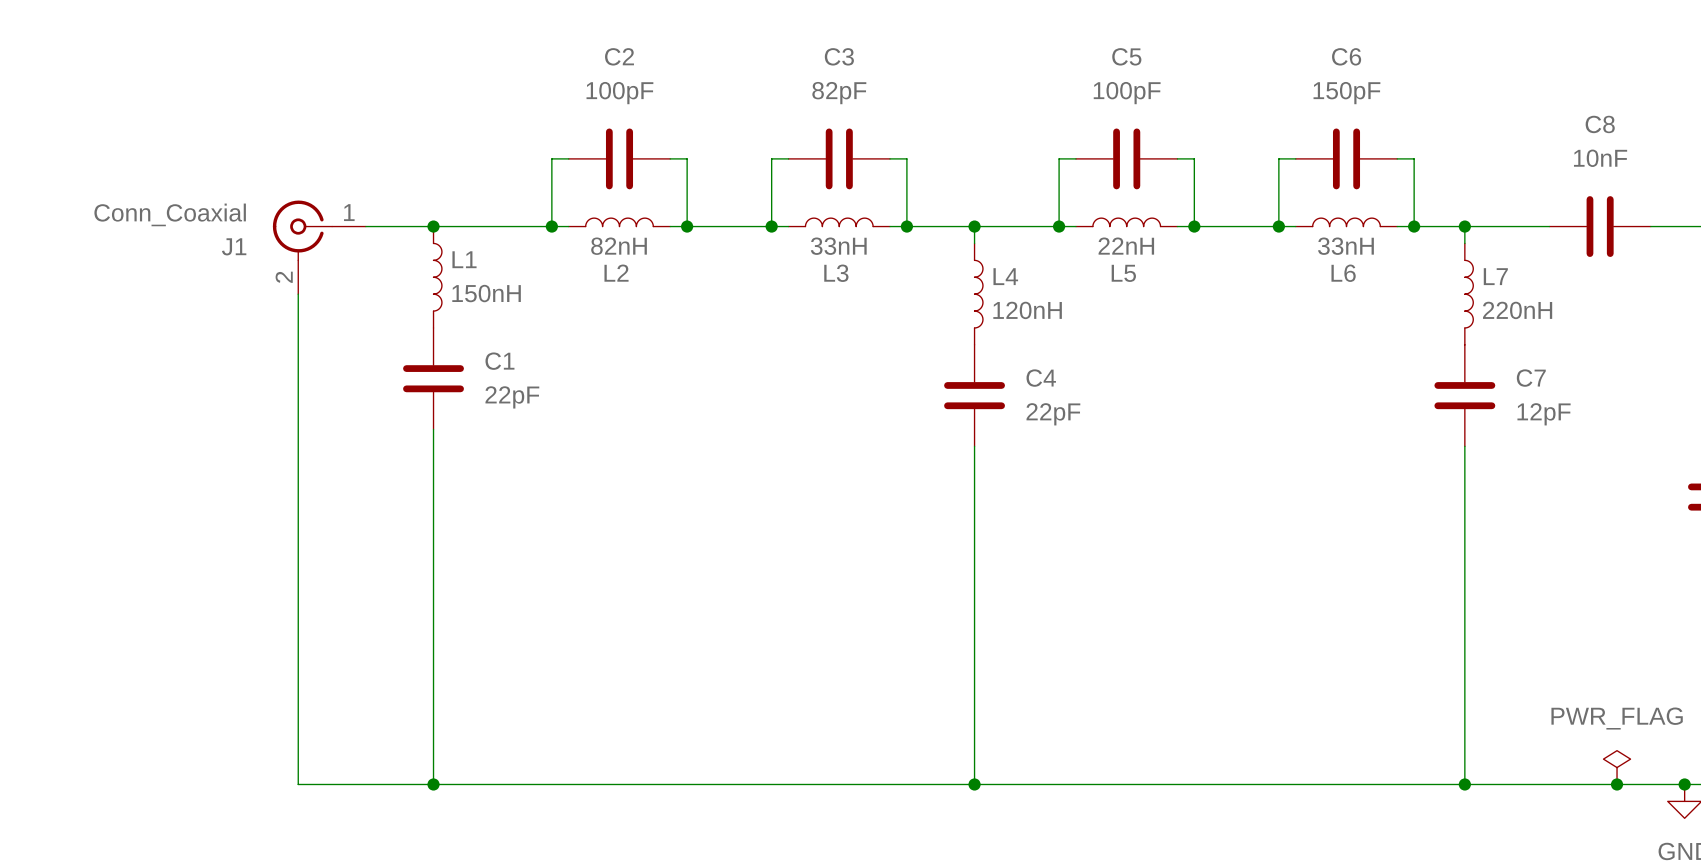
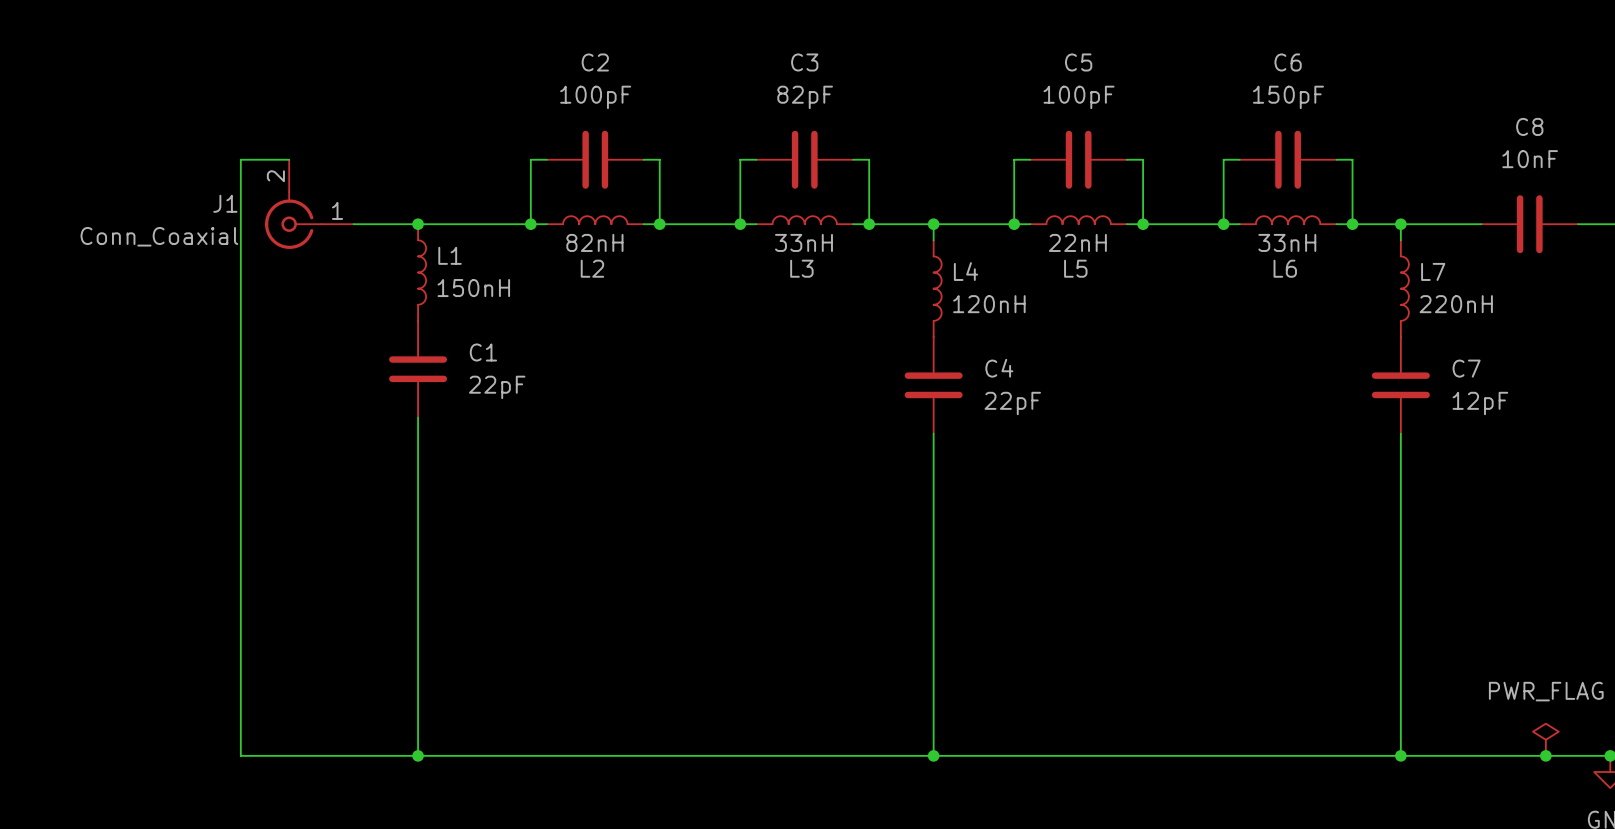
J1 flip: as is (302, 230) -> up-down (293, 220)
wire: (298, 294) (298, 784) -> (289, 159) (240, 159) (240, 755) (289, 755)

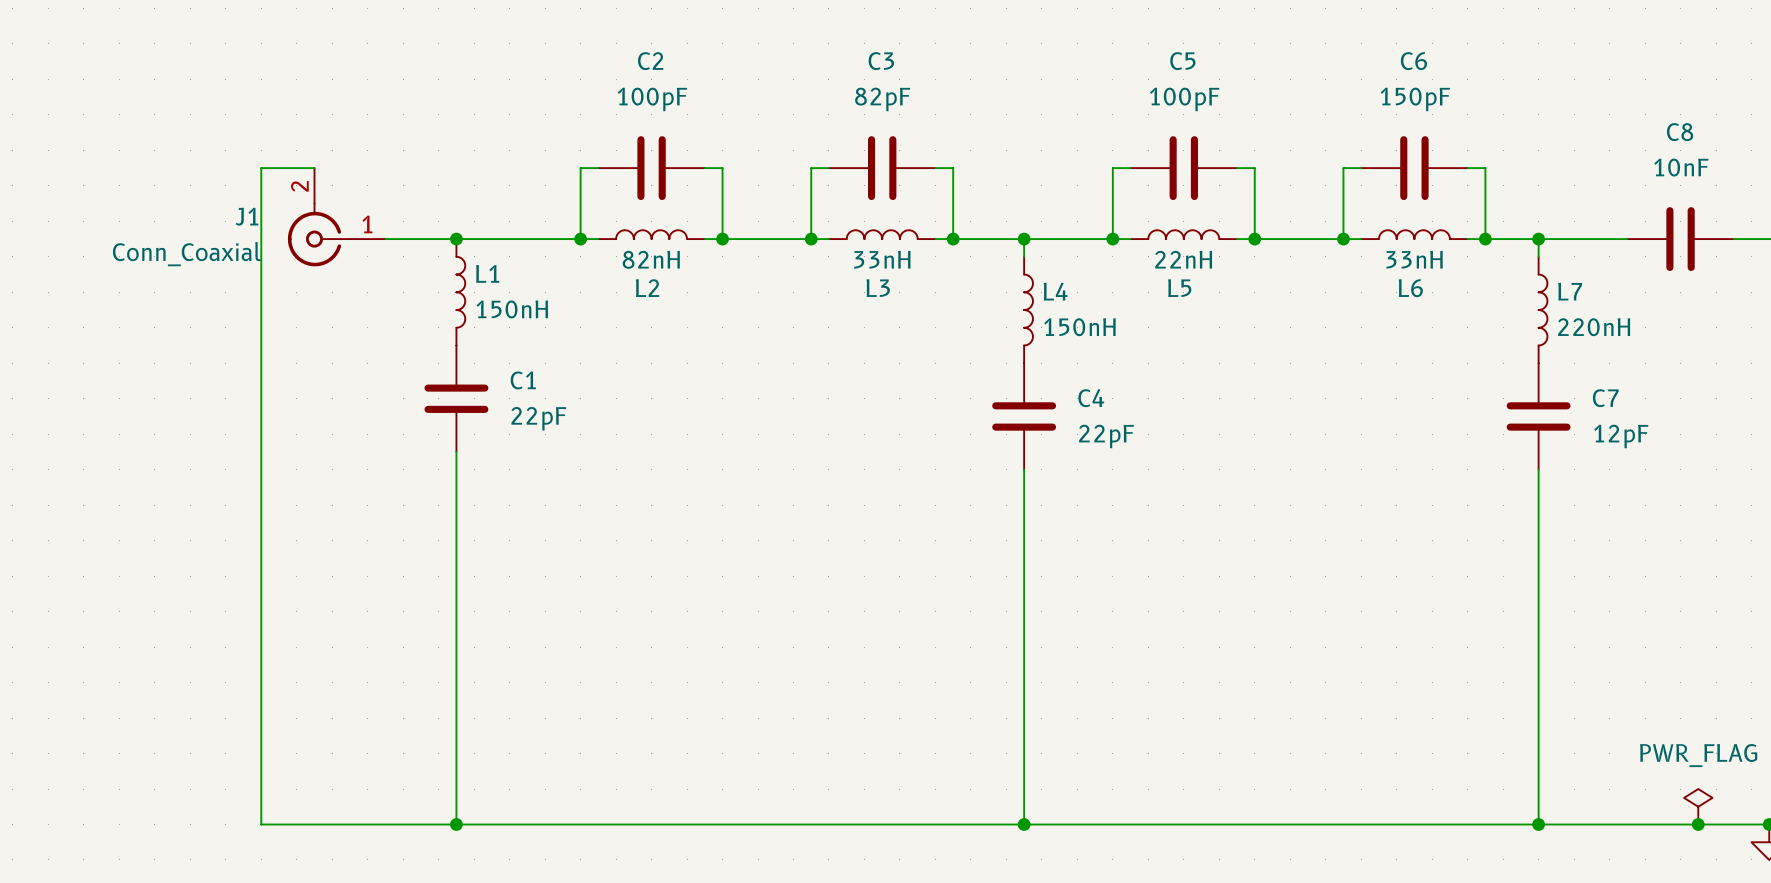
L4 value: 120nH (989, 304) -> 150nH (1079, 327)

